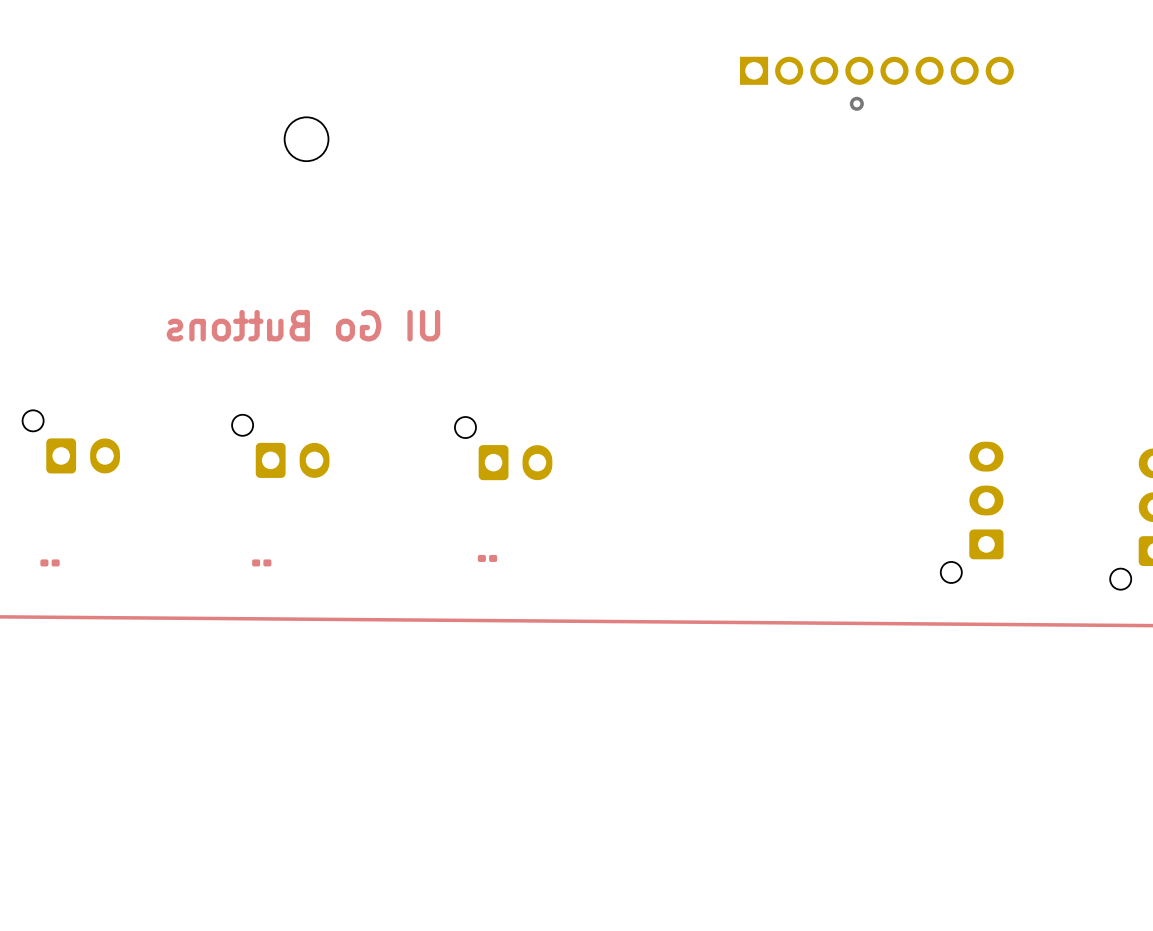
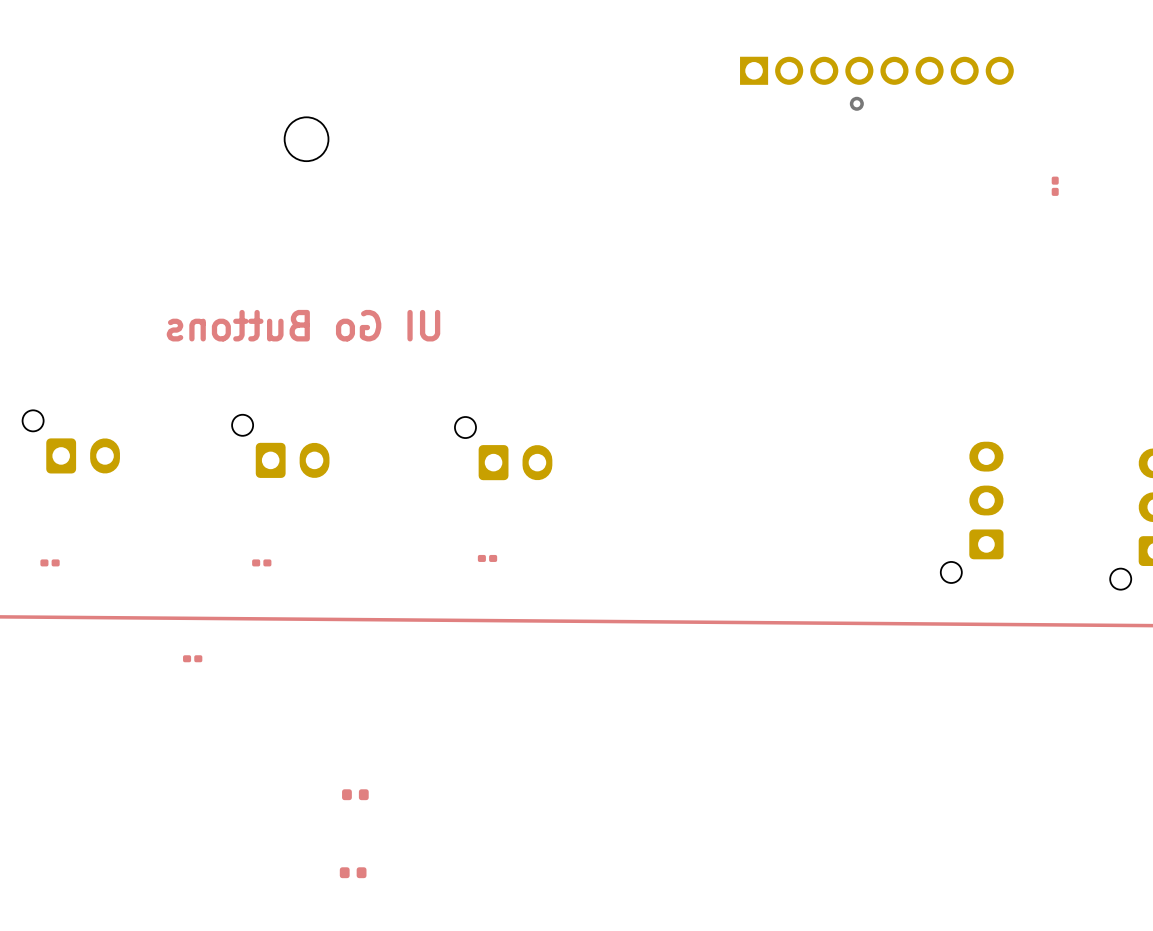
part: none -> (1055, 186)
part: none -> (192, 658)
part: none -> (355, 794)
part: none -> (353, 872)

